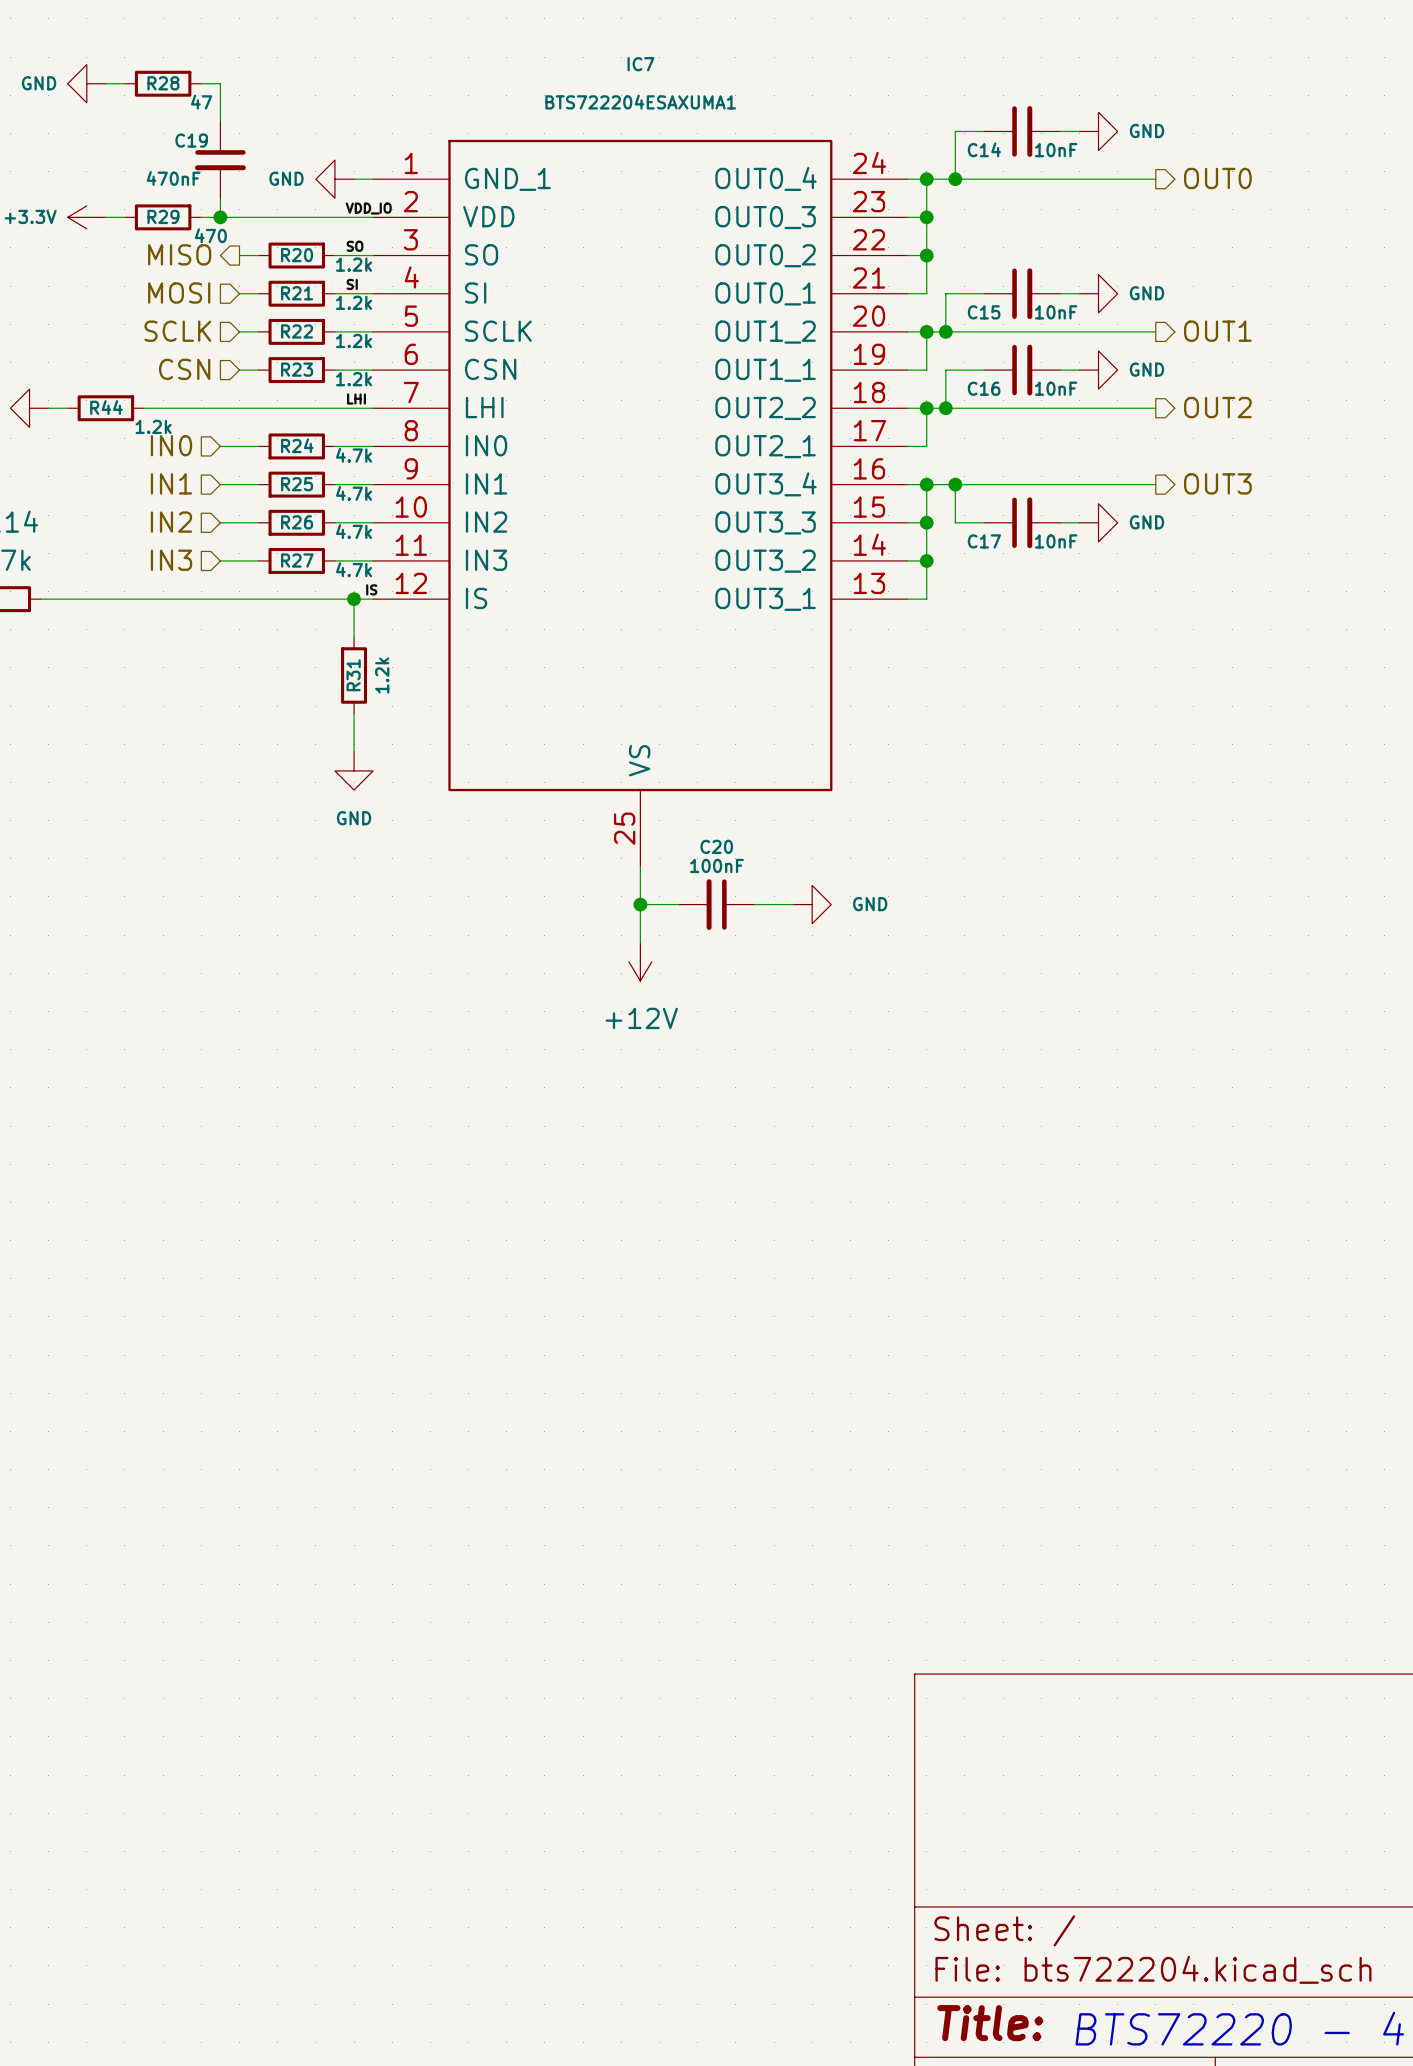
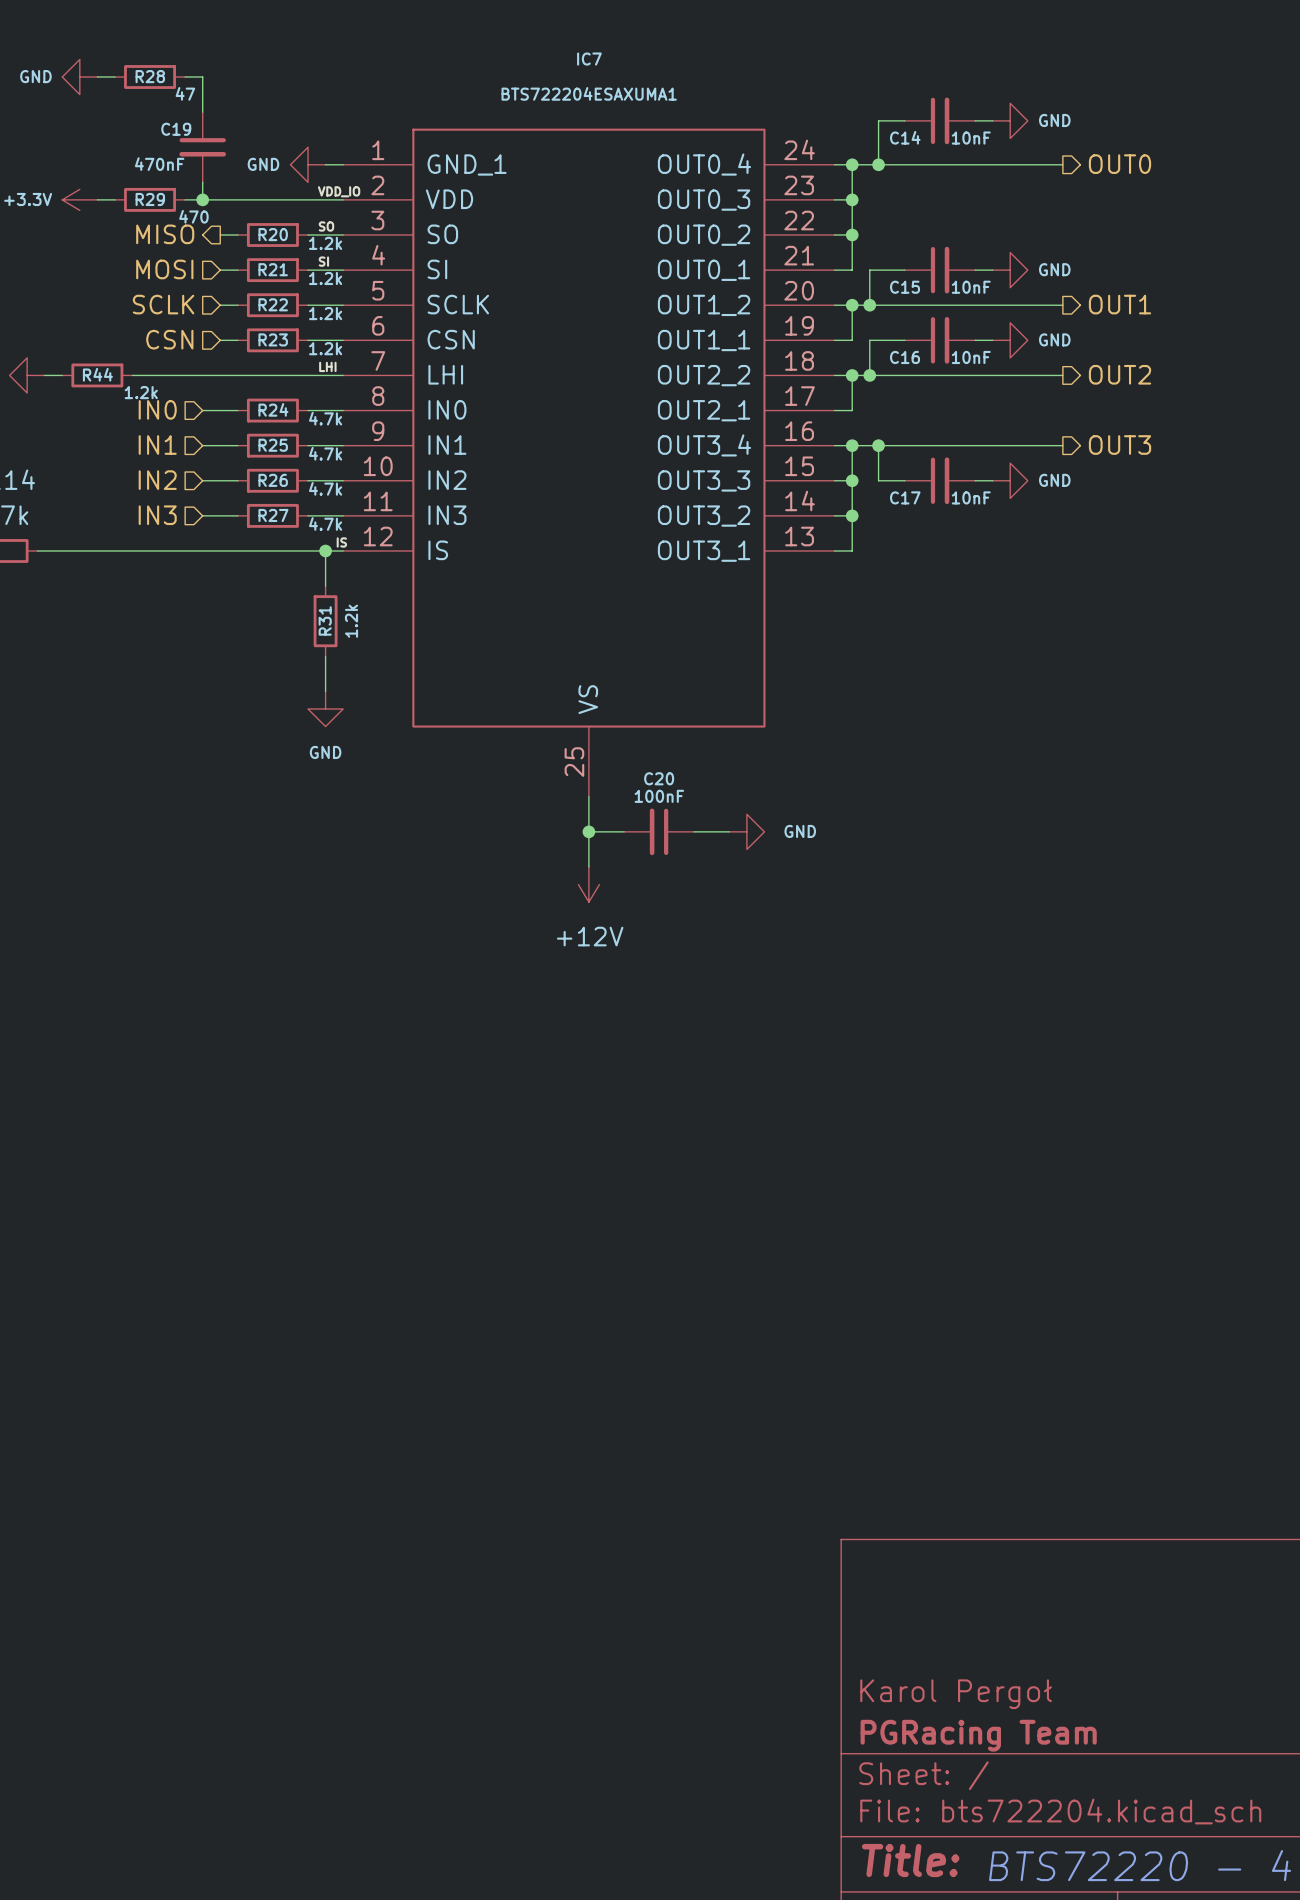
title block: none -> Karol Pergoł (956, 1694)
title block: none -> PGRacing Team (978, 1735)

